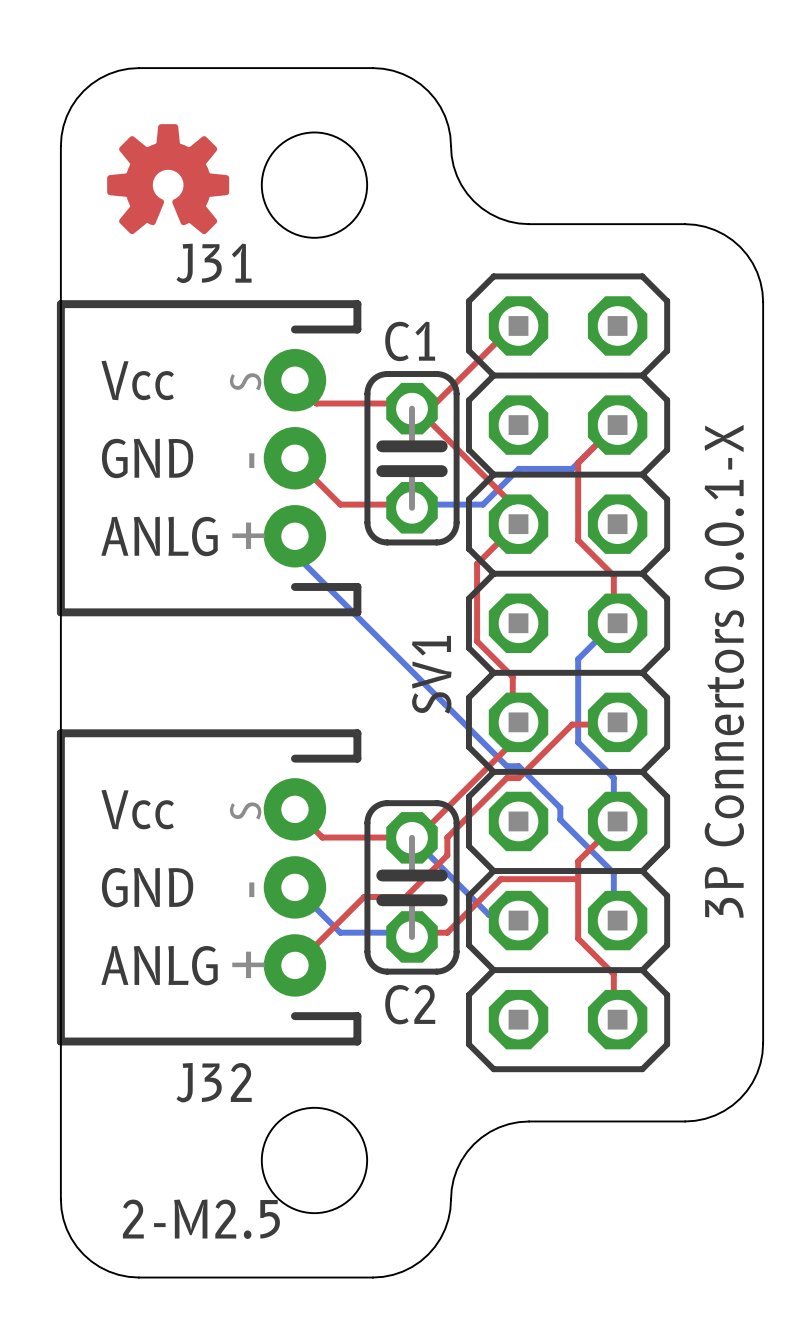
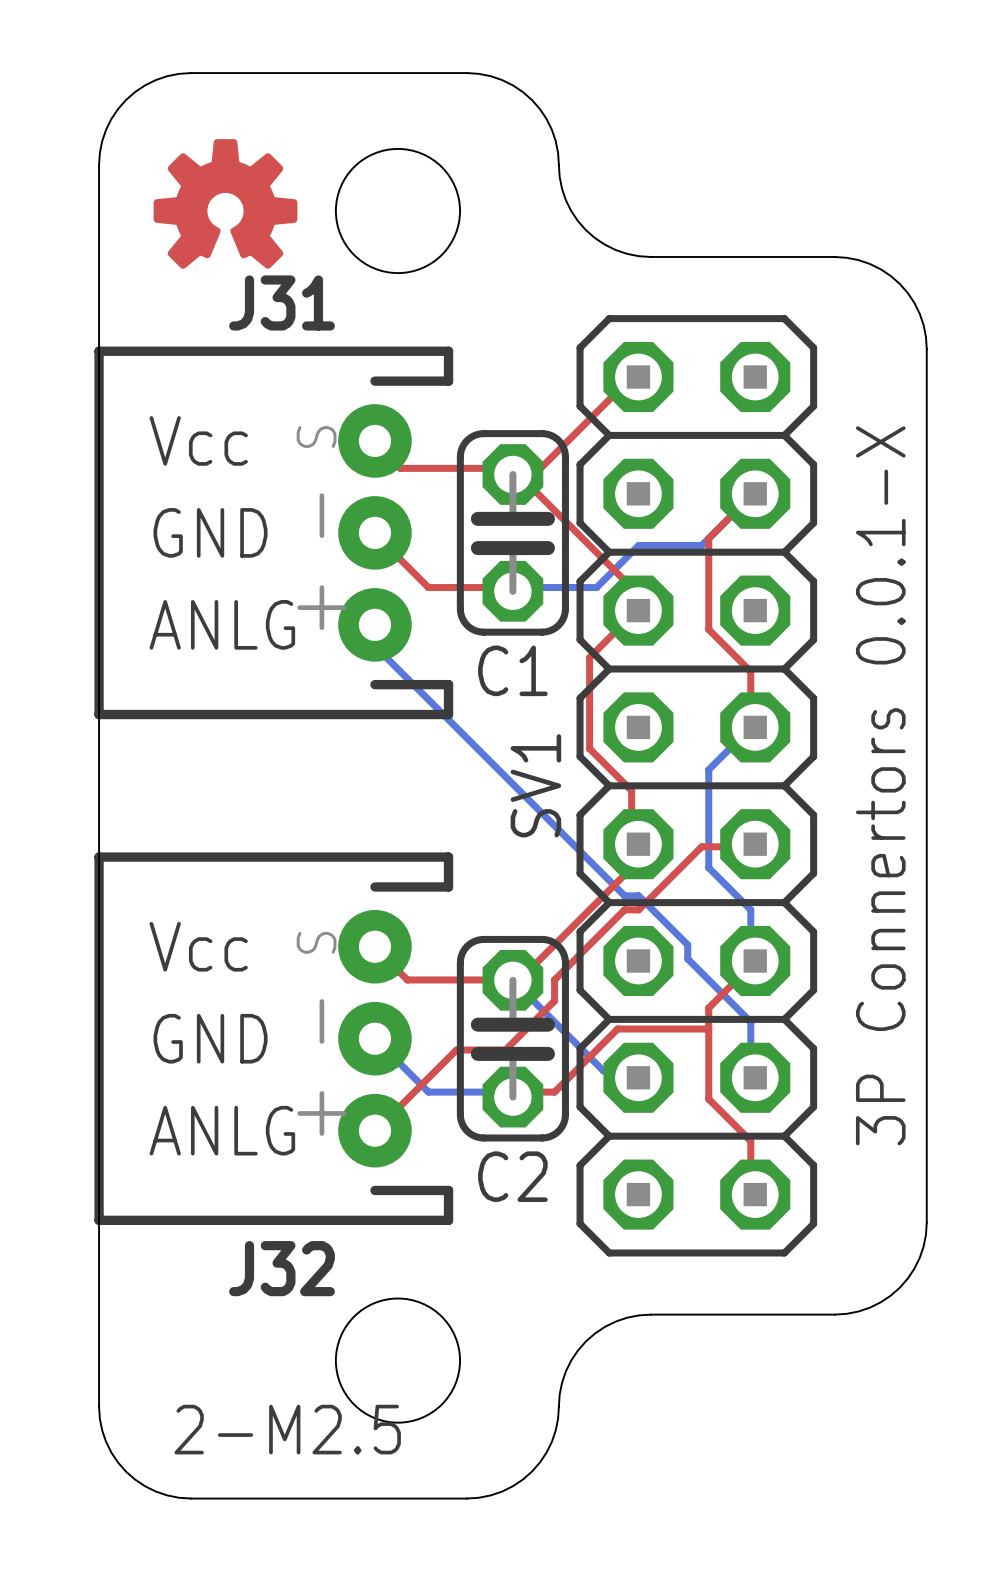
C1 name position: C1 (410, 341) -> C1 (512, 670)

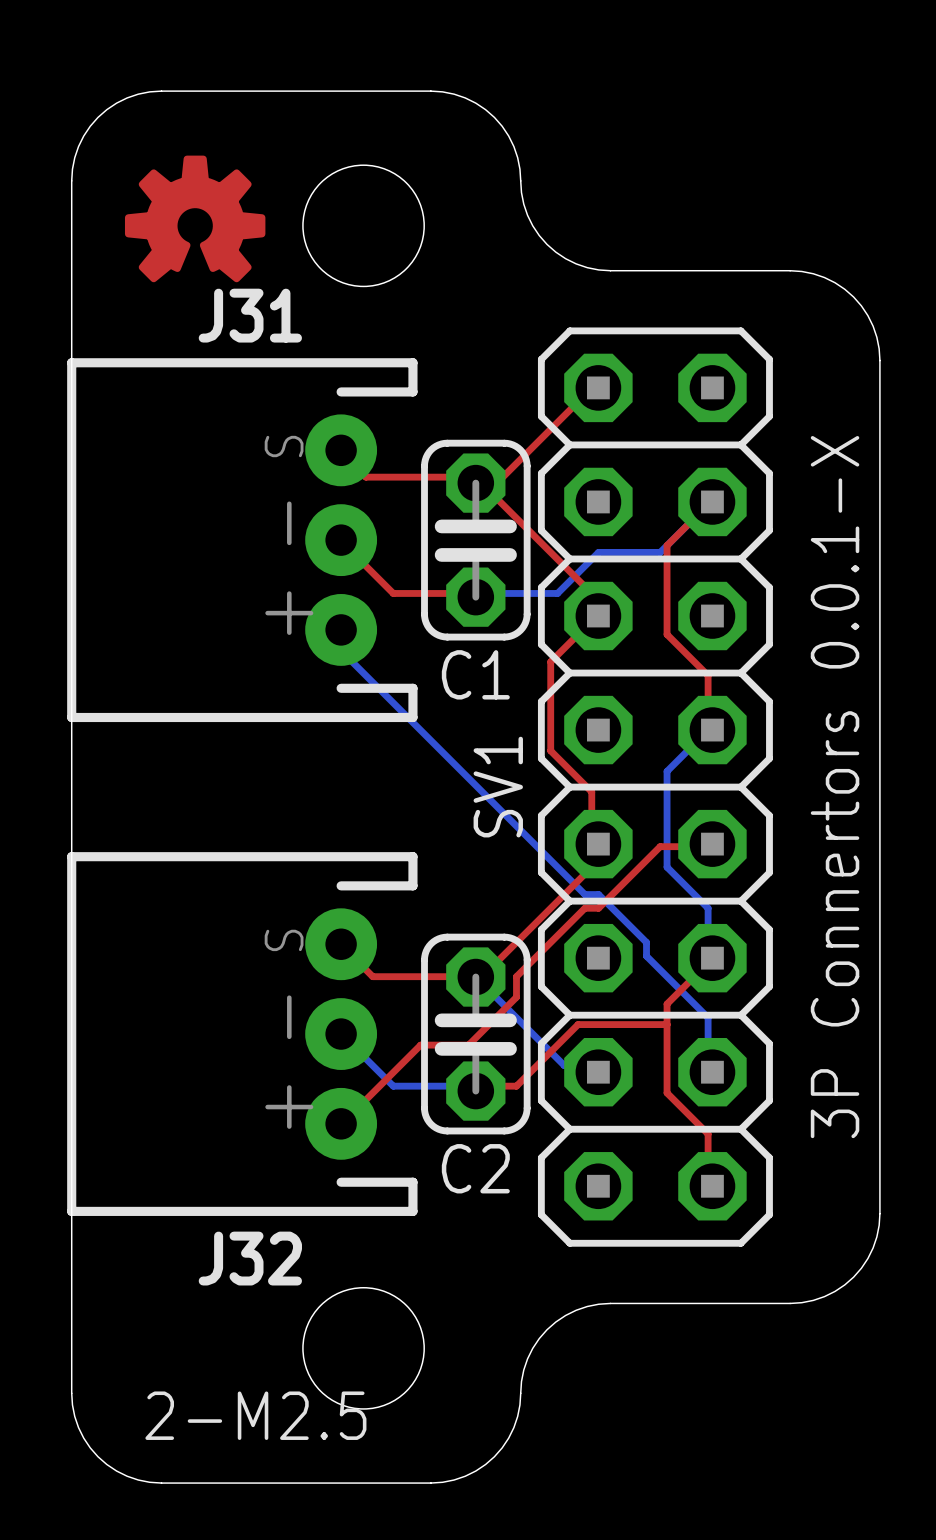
text: Vcc (198, 440) -> none
text: GND (210, 532) -> none
text: ANLG (222, 624) -> none
text: Vcc (198, 946) -> none
text: GND (210, 1038) -> none
text: ANLG (222, 1130) -> none

